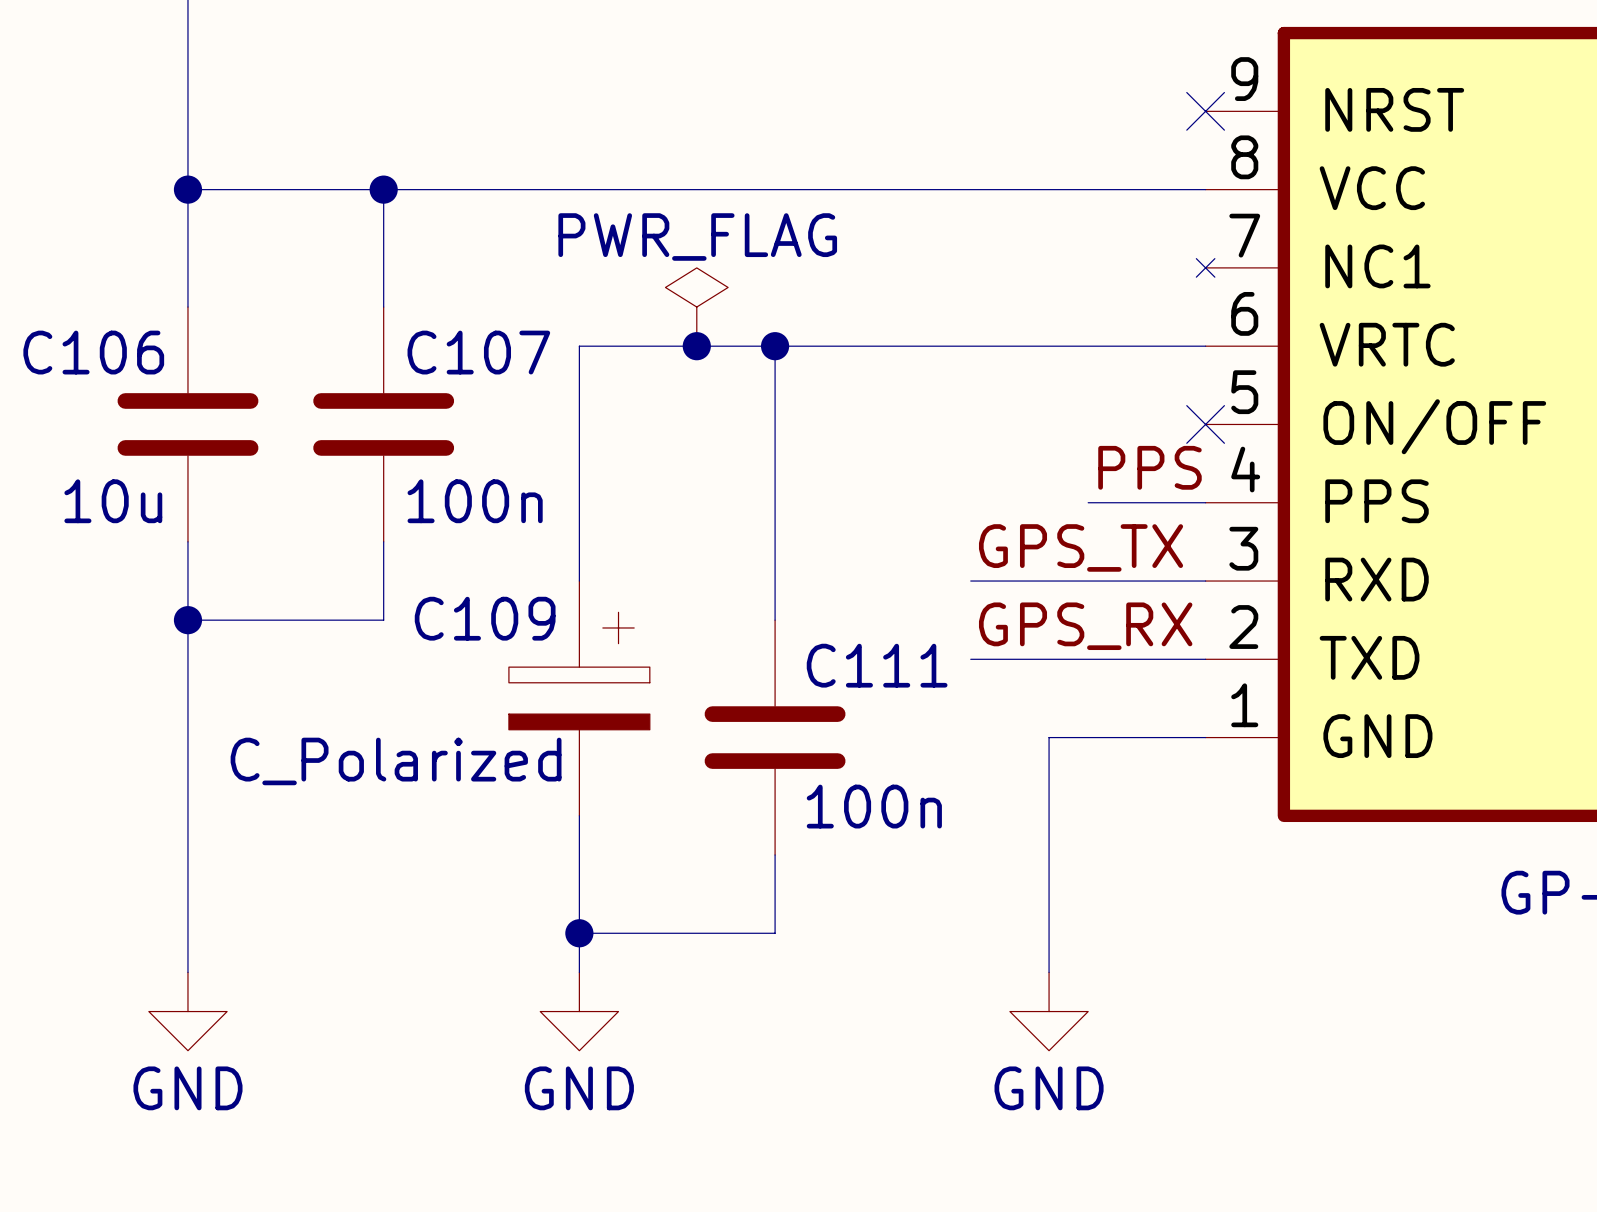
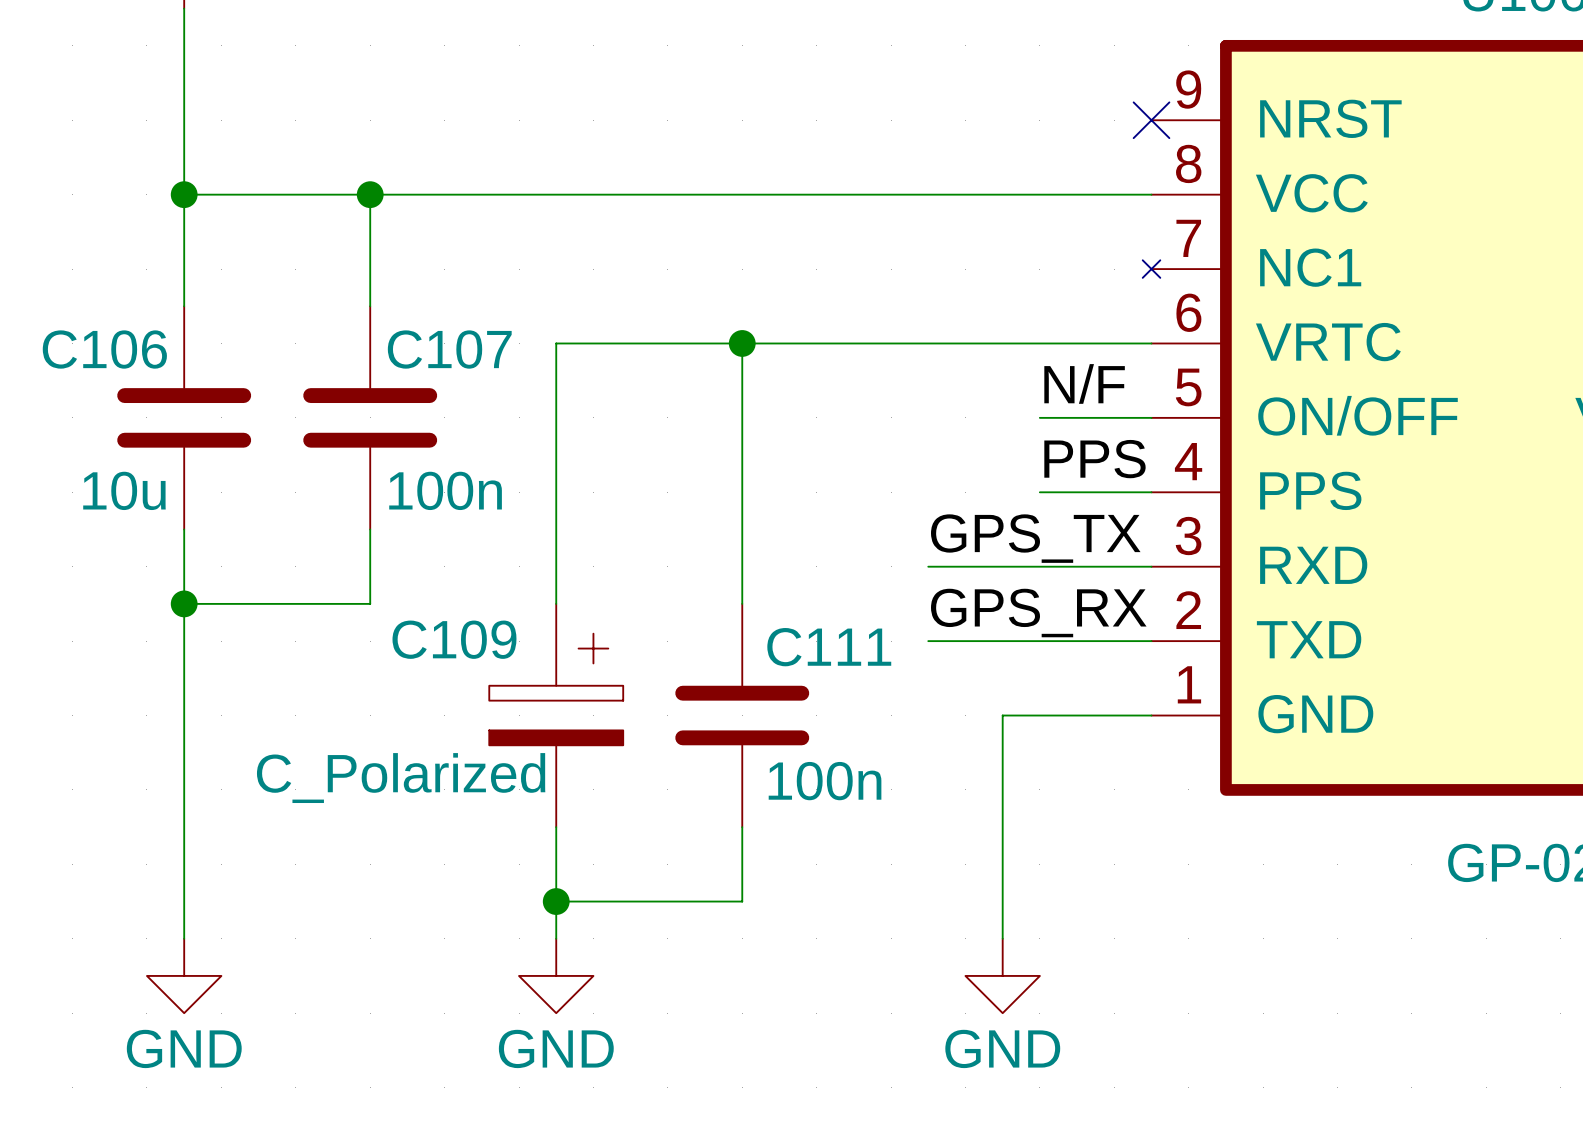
power symbol: PWR_FLAG (696, 307) -> none
junction: (696, 346) -> none
label: none -> N/F (1084, 383)
wire: none -> (1039, 417) (1151, 417)
no-connect mark: (1205, 424) -> none
C109 name position: C109 (485, 618) -> C109 (454, 639)
C109 position: (579, 698) -> (556, 715)

